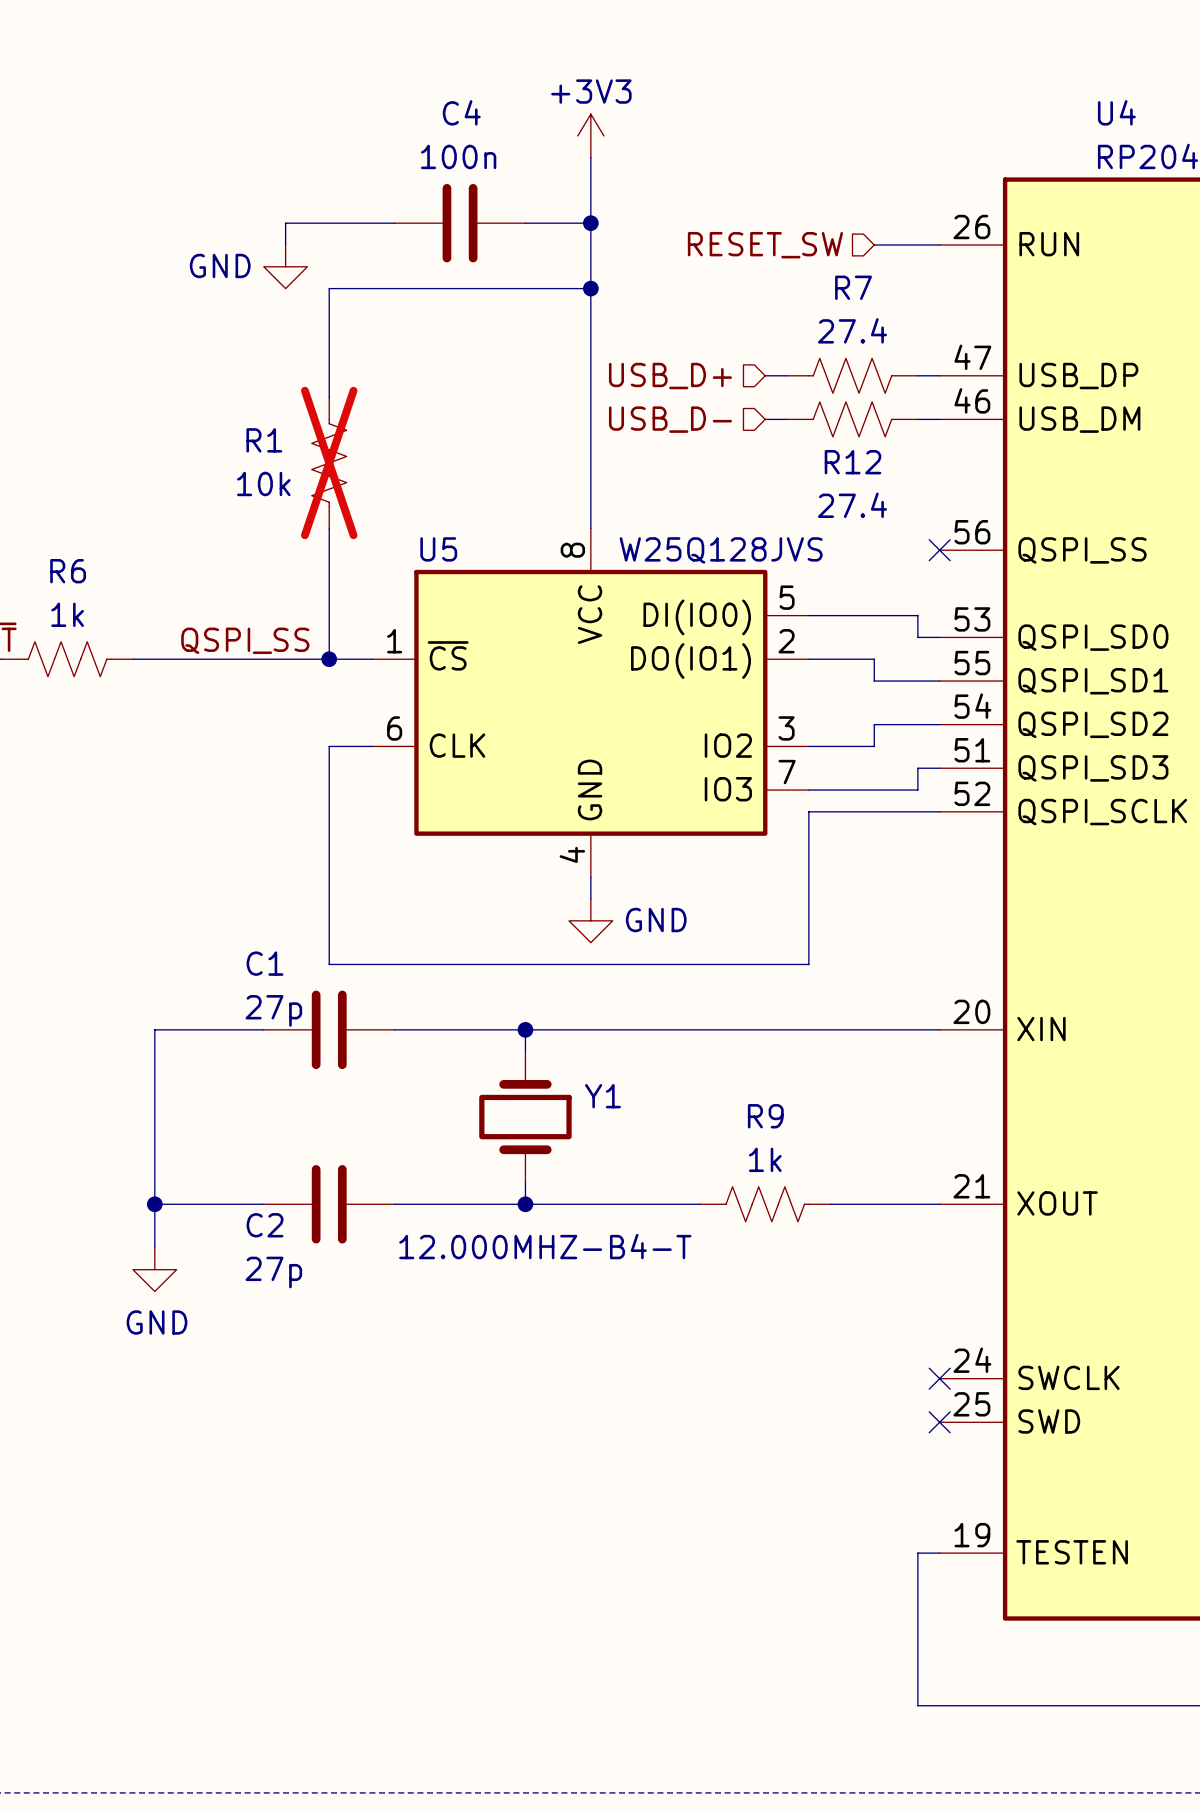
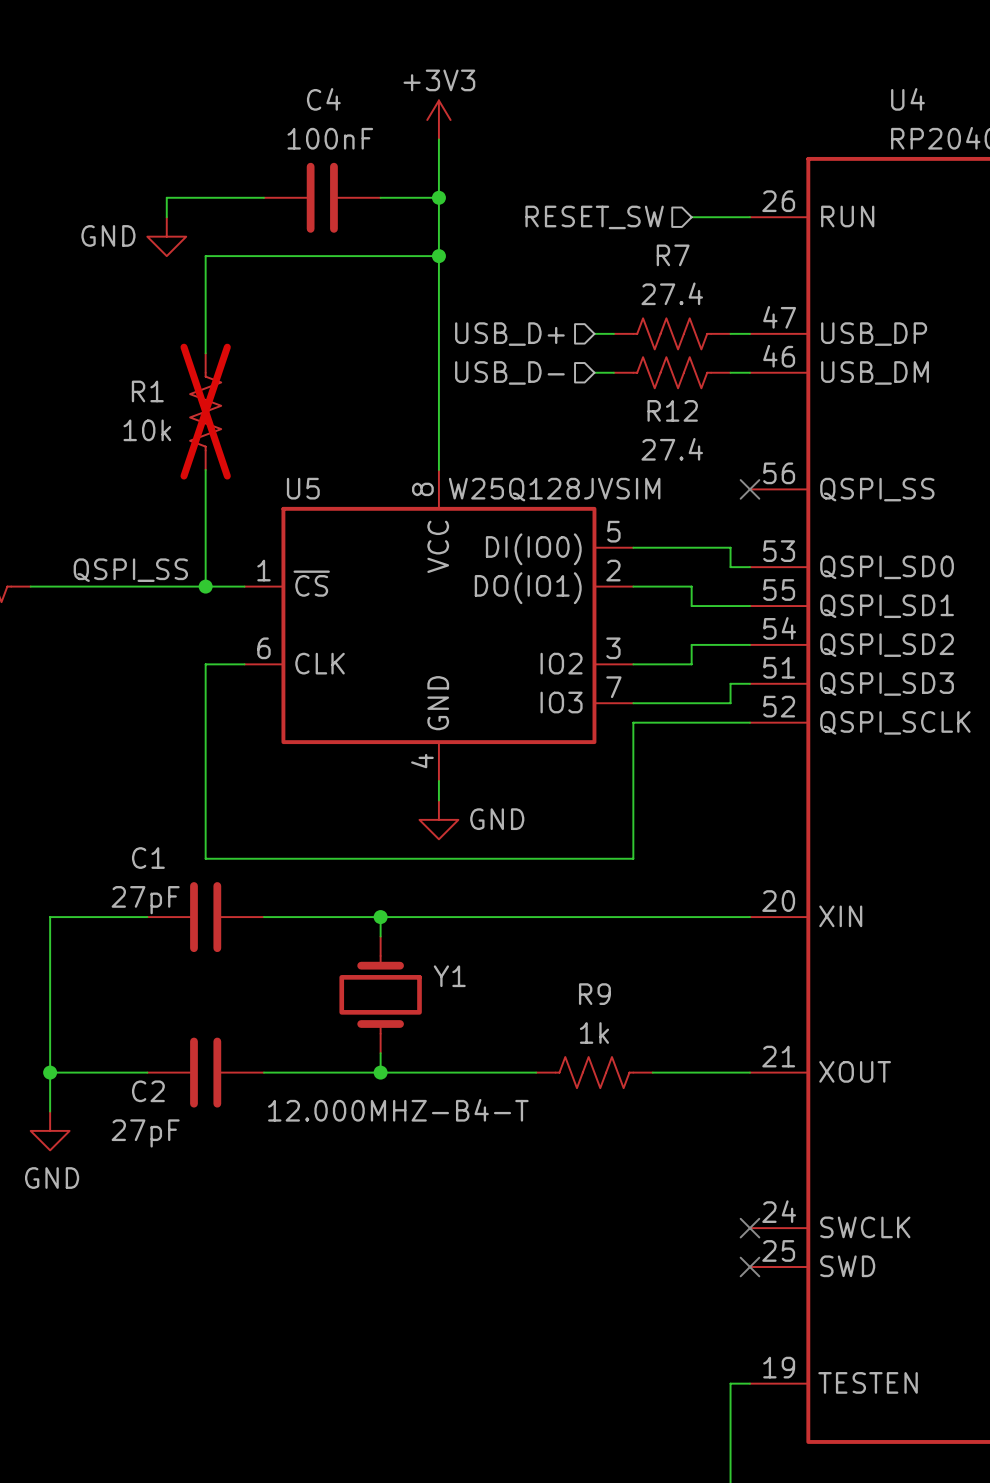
C4 value: 100n (458, 156) -> 100nF (330, 138)
U5 value: W25Q128JVS (721, 550) -> W25Q128JVSIM (554, 489)
C1 value: 27p (273, 1010) -> 27pF (145, 900)
C2 value: 27p (273, 1272) -> 27pF (145, 1133)

